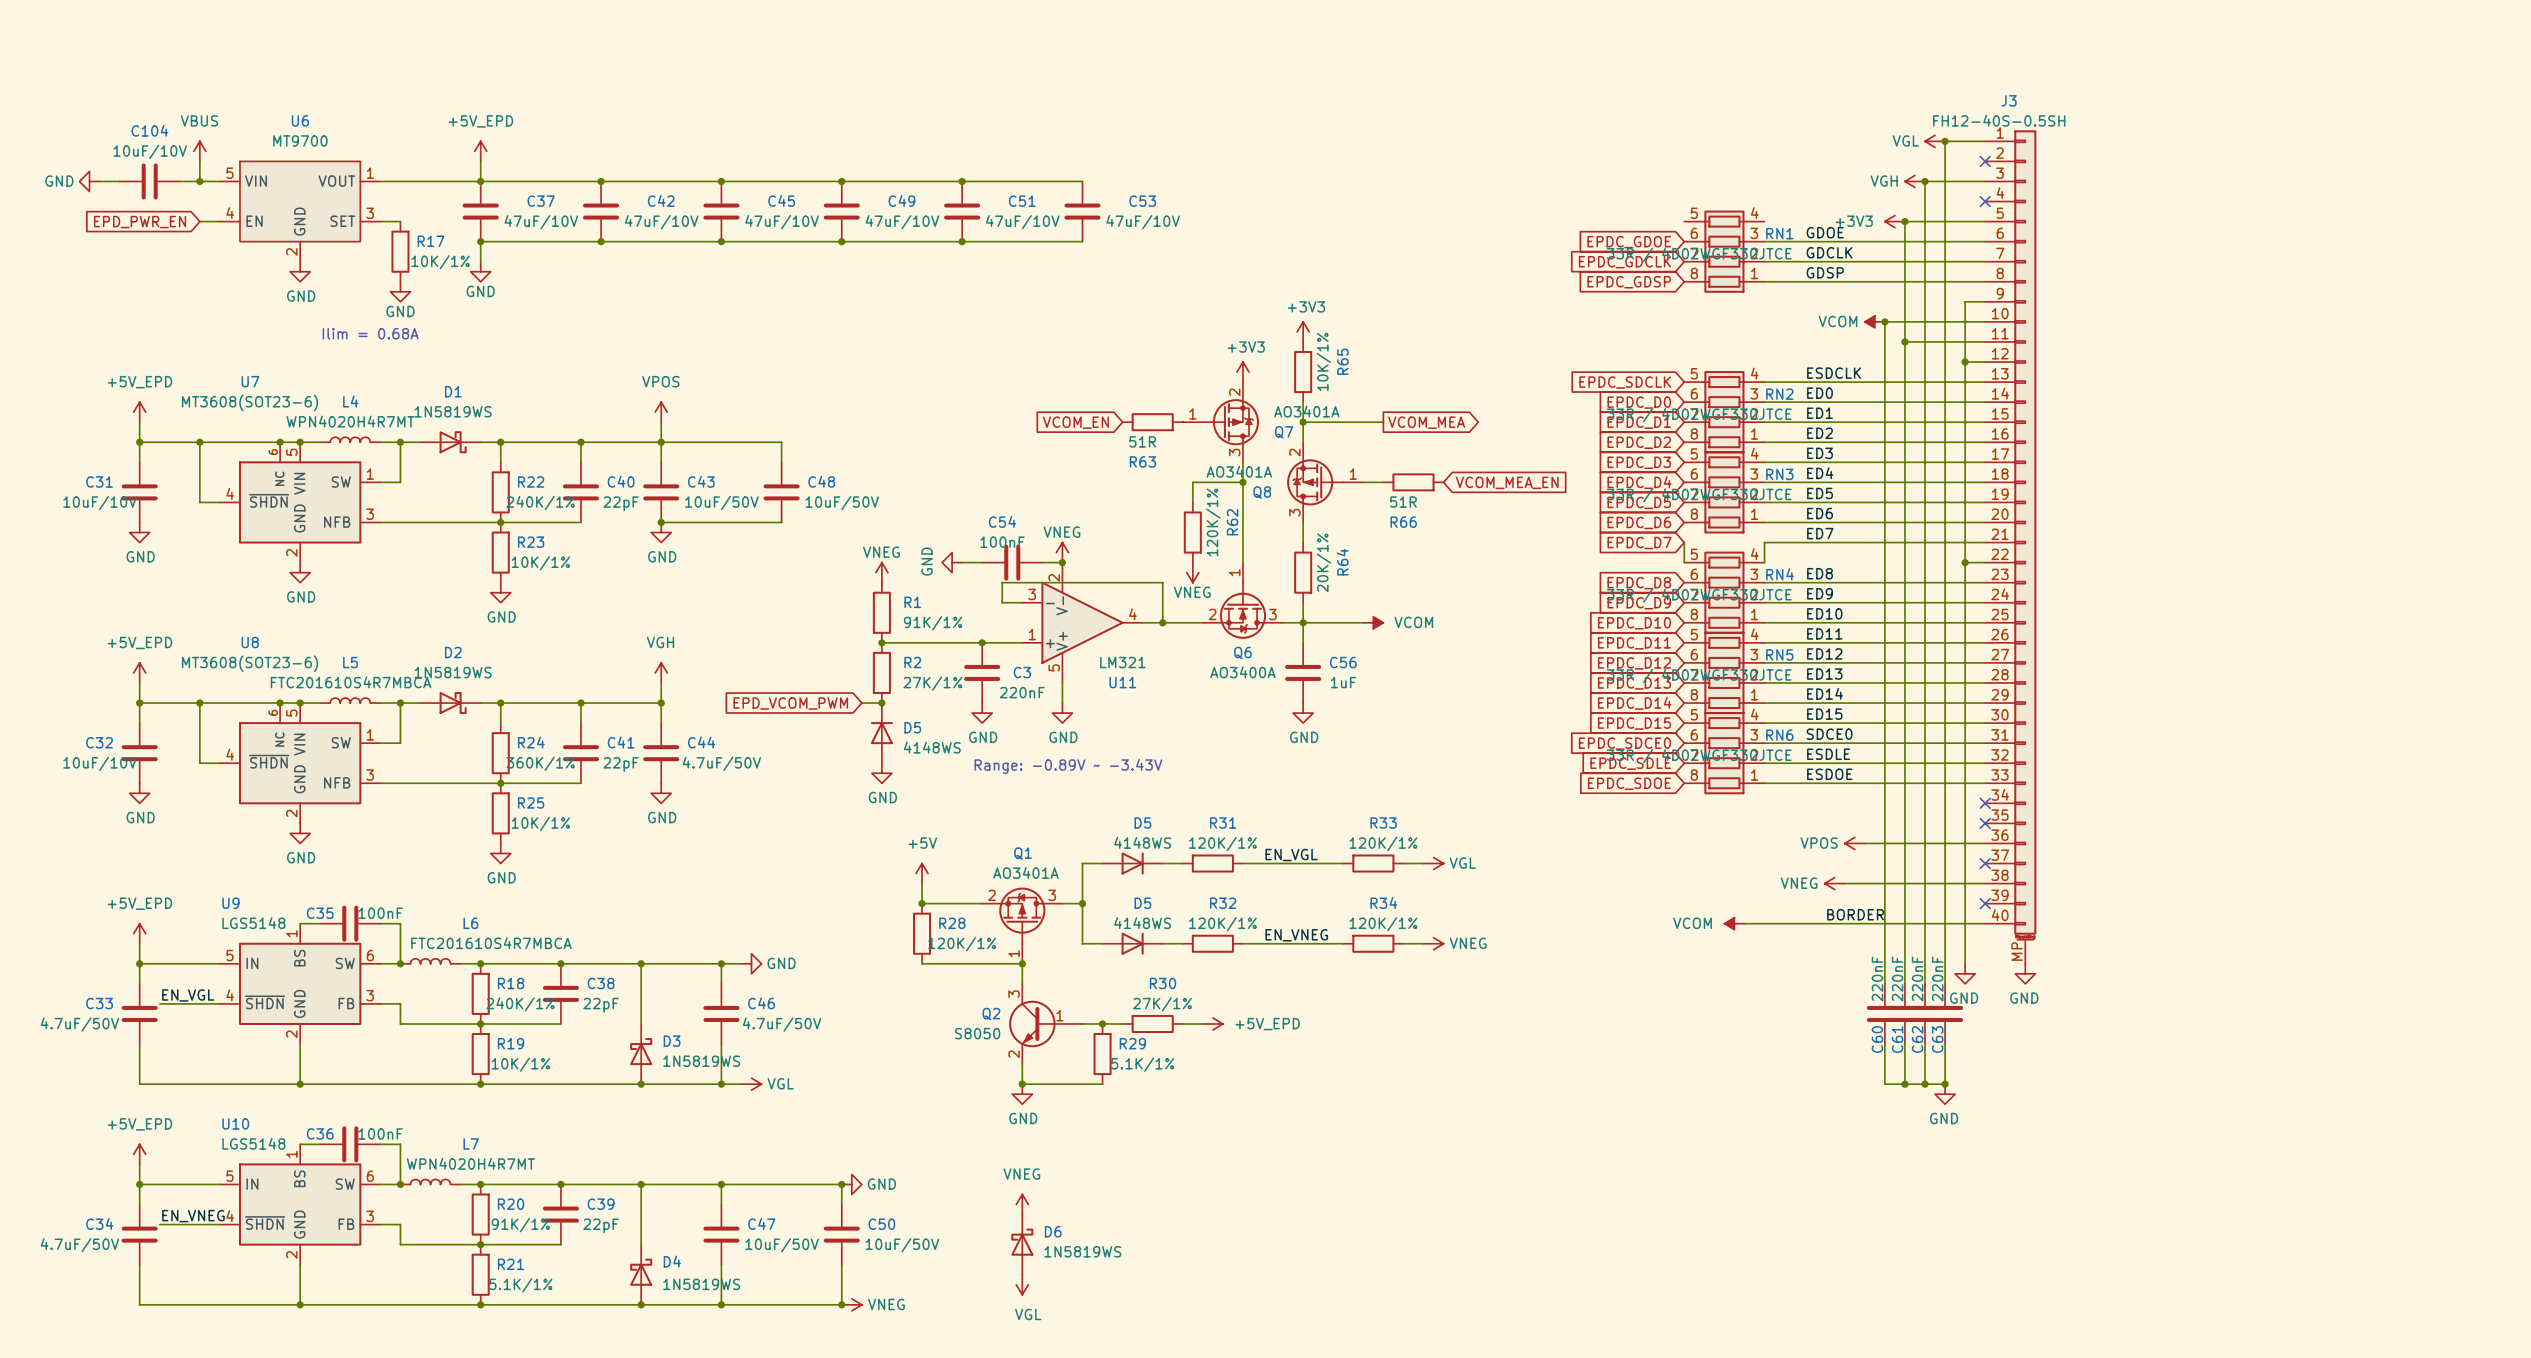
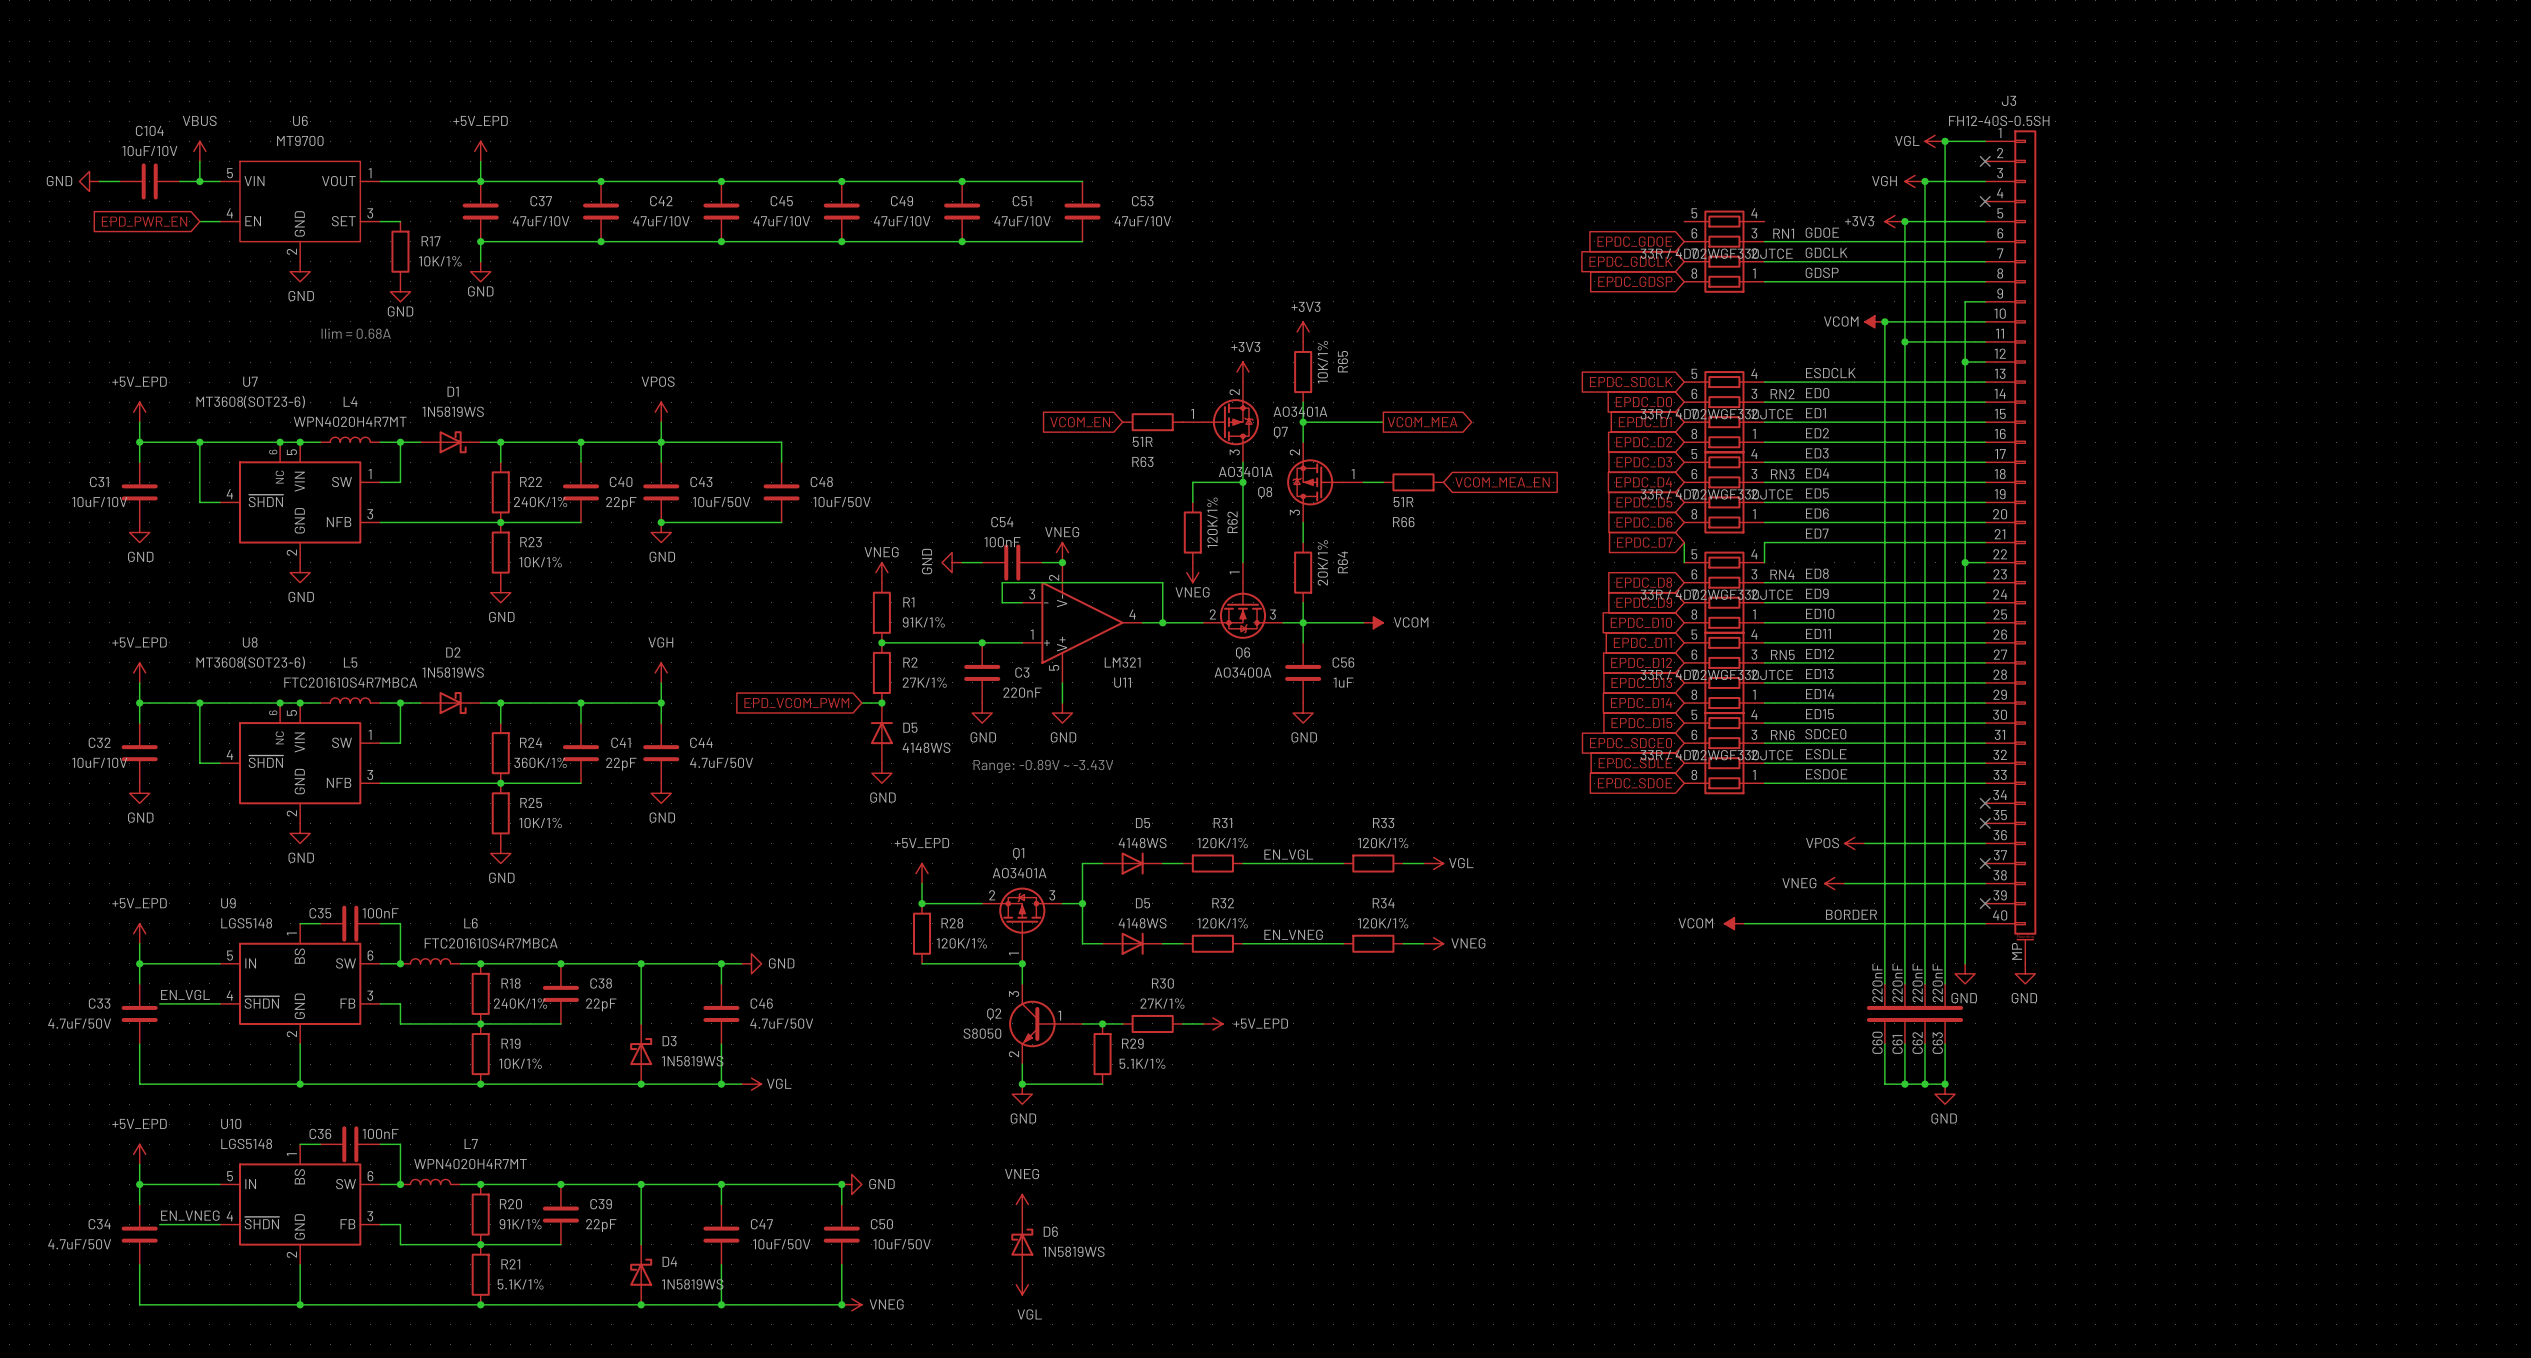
power symbol: +5V (922, 873) -> +5V_EPD (922, 873)

